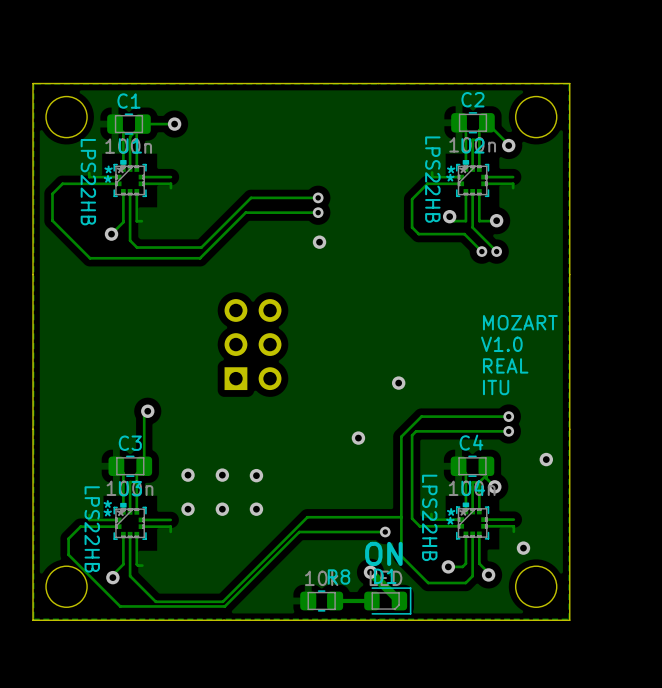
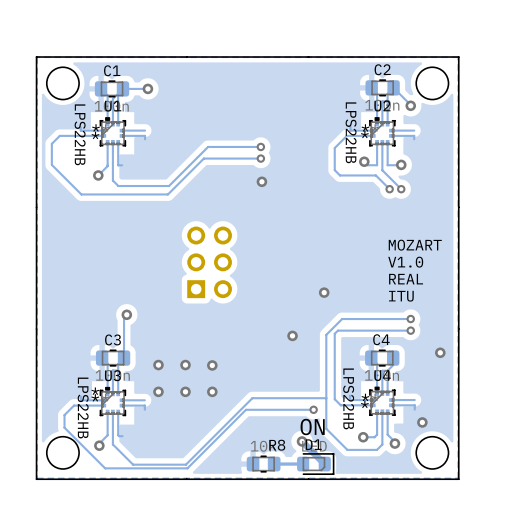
track: (486, 475) (486, 478) (494, 486) -> none
via: (494, 486) -> none

